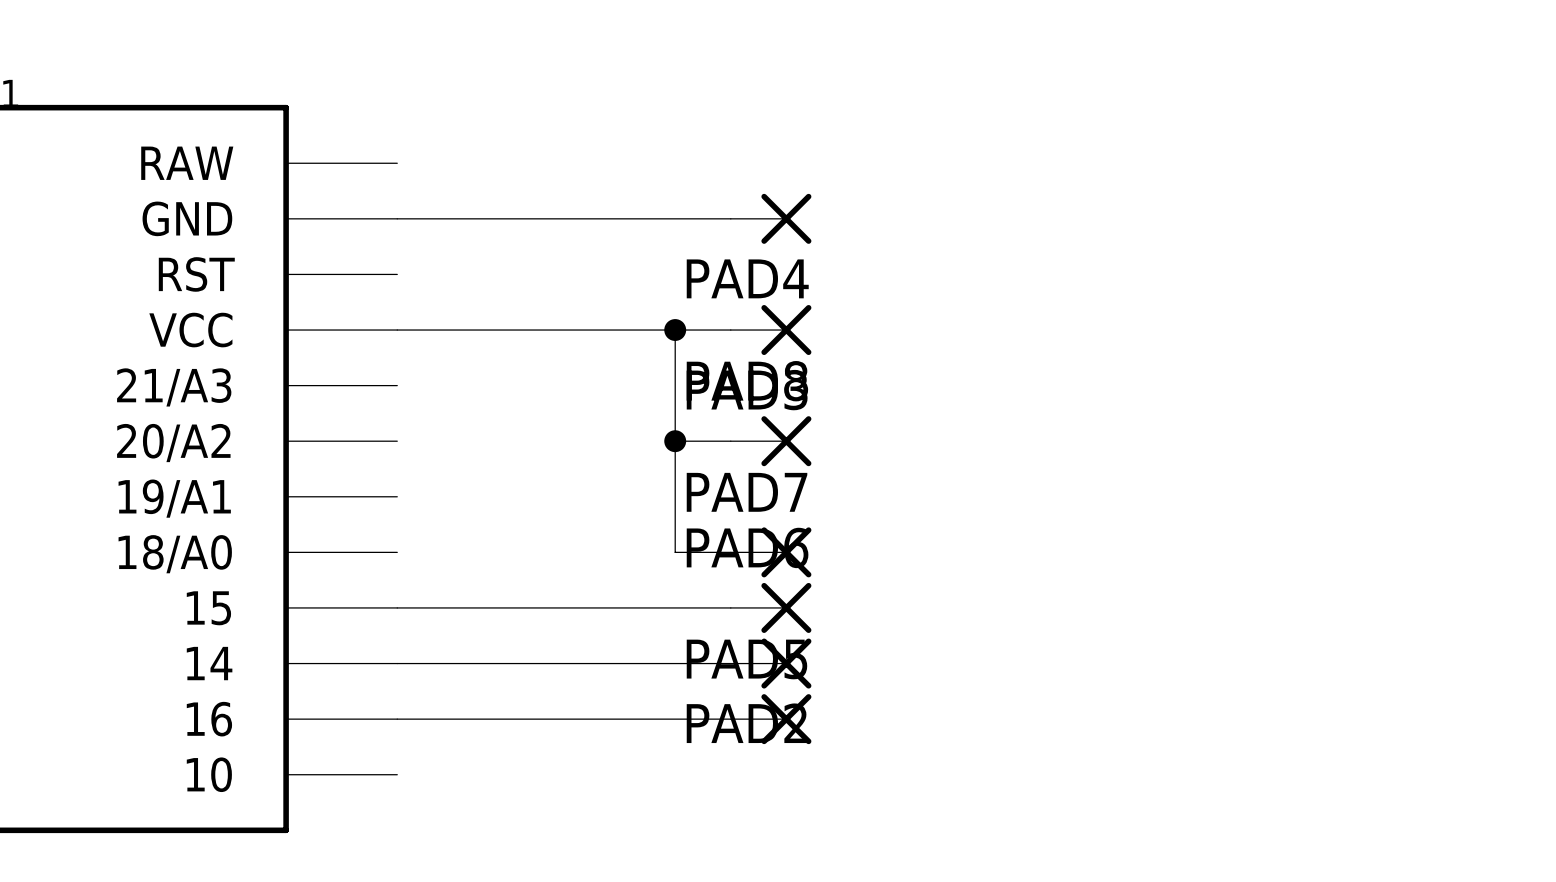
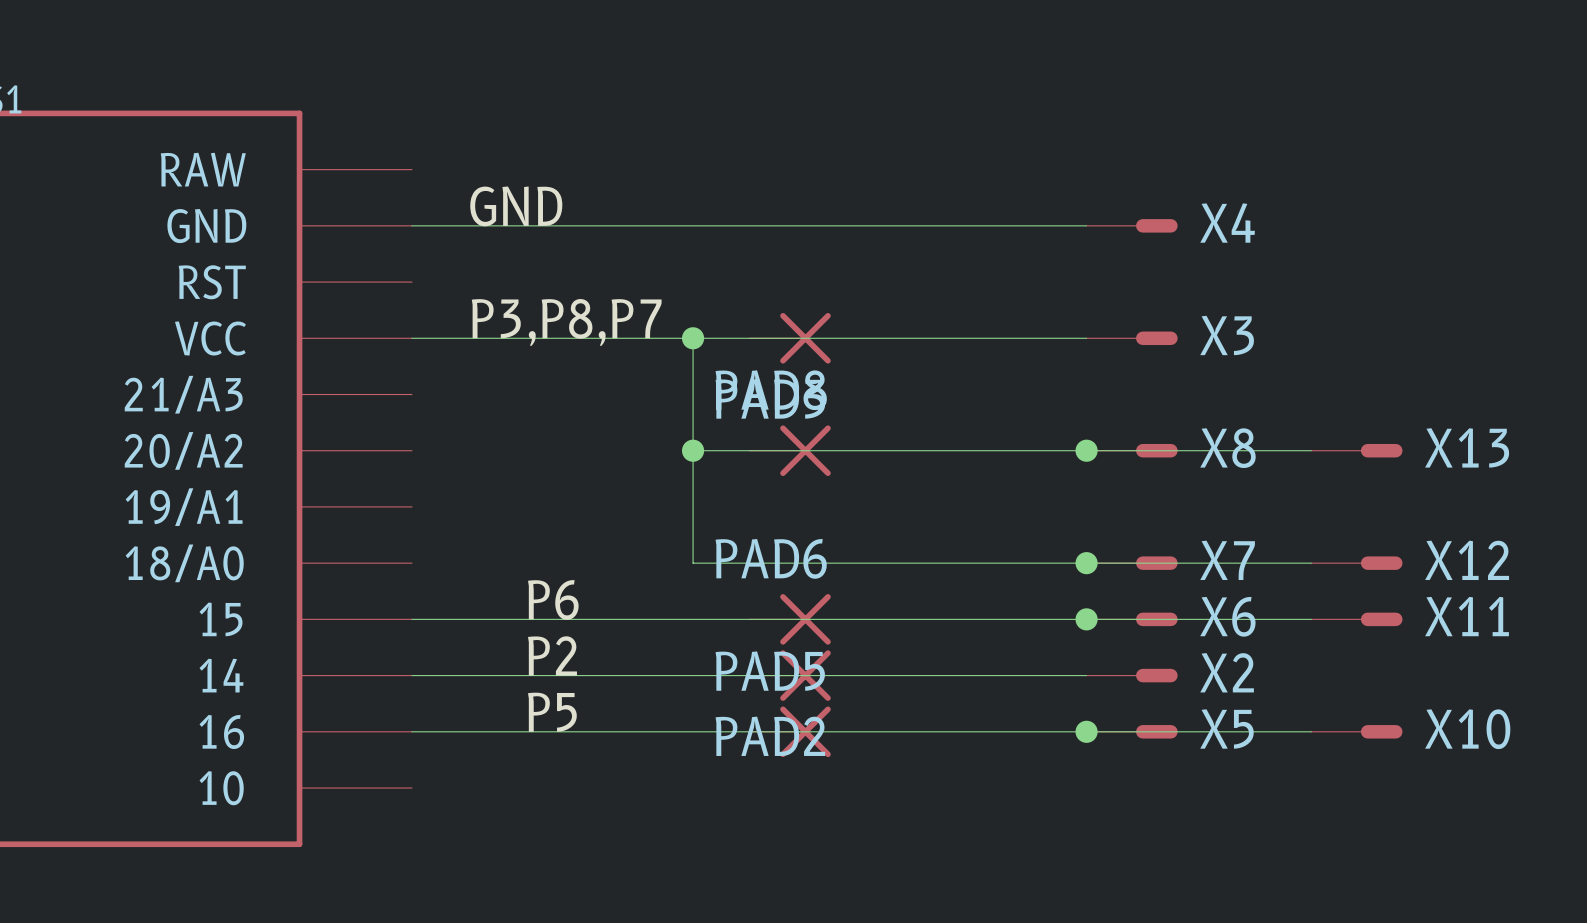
label: none -> GND (516, 206)
wire: none -> (749, 225) (1086, 225)
PAD4: (771, 218) -> none
X4: none -> (1132, 225)
label: none -> P3,P8,P7 (566, 322)
wire: none -> (749, 338) (1086, 338)
X3: none -> (1132, 338)
wire: none -> (749, 450) (1311, 450)
junction: none -> (1086, 450)
X8: none -> (1132, 450)
X13: none -> (1356, 450)
wire: none -> (749, 563) (1311, 563)
PAD7: (771, 552) -> none
junction: none -> (1086, 563)
X7: none -> (1132, 563)
X12: none -> (1356, 563)
label: none -> P6 (553, 599)
wire: none -> (749, 619) (1311, 619)
junction: none -> (1086, 619)
X6: none -> (1132, 619)
X11: none -> (1356, 619)
label: none -> P2 (552, 655)
wire: none -> (749, 675) (1086, 675)
X2: none -> (1132, 675)
label: none -> P5 (552, 712)
wire: none -> (749, 731) (1311, 731)
junction: none -> (1086, 731)
X5: none -> (1132, 731)
X10: none -> (1356, 731)

